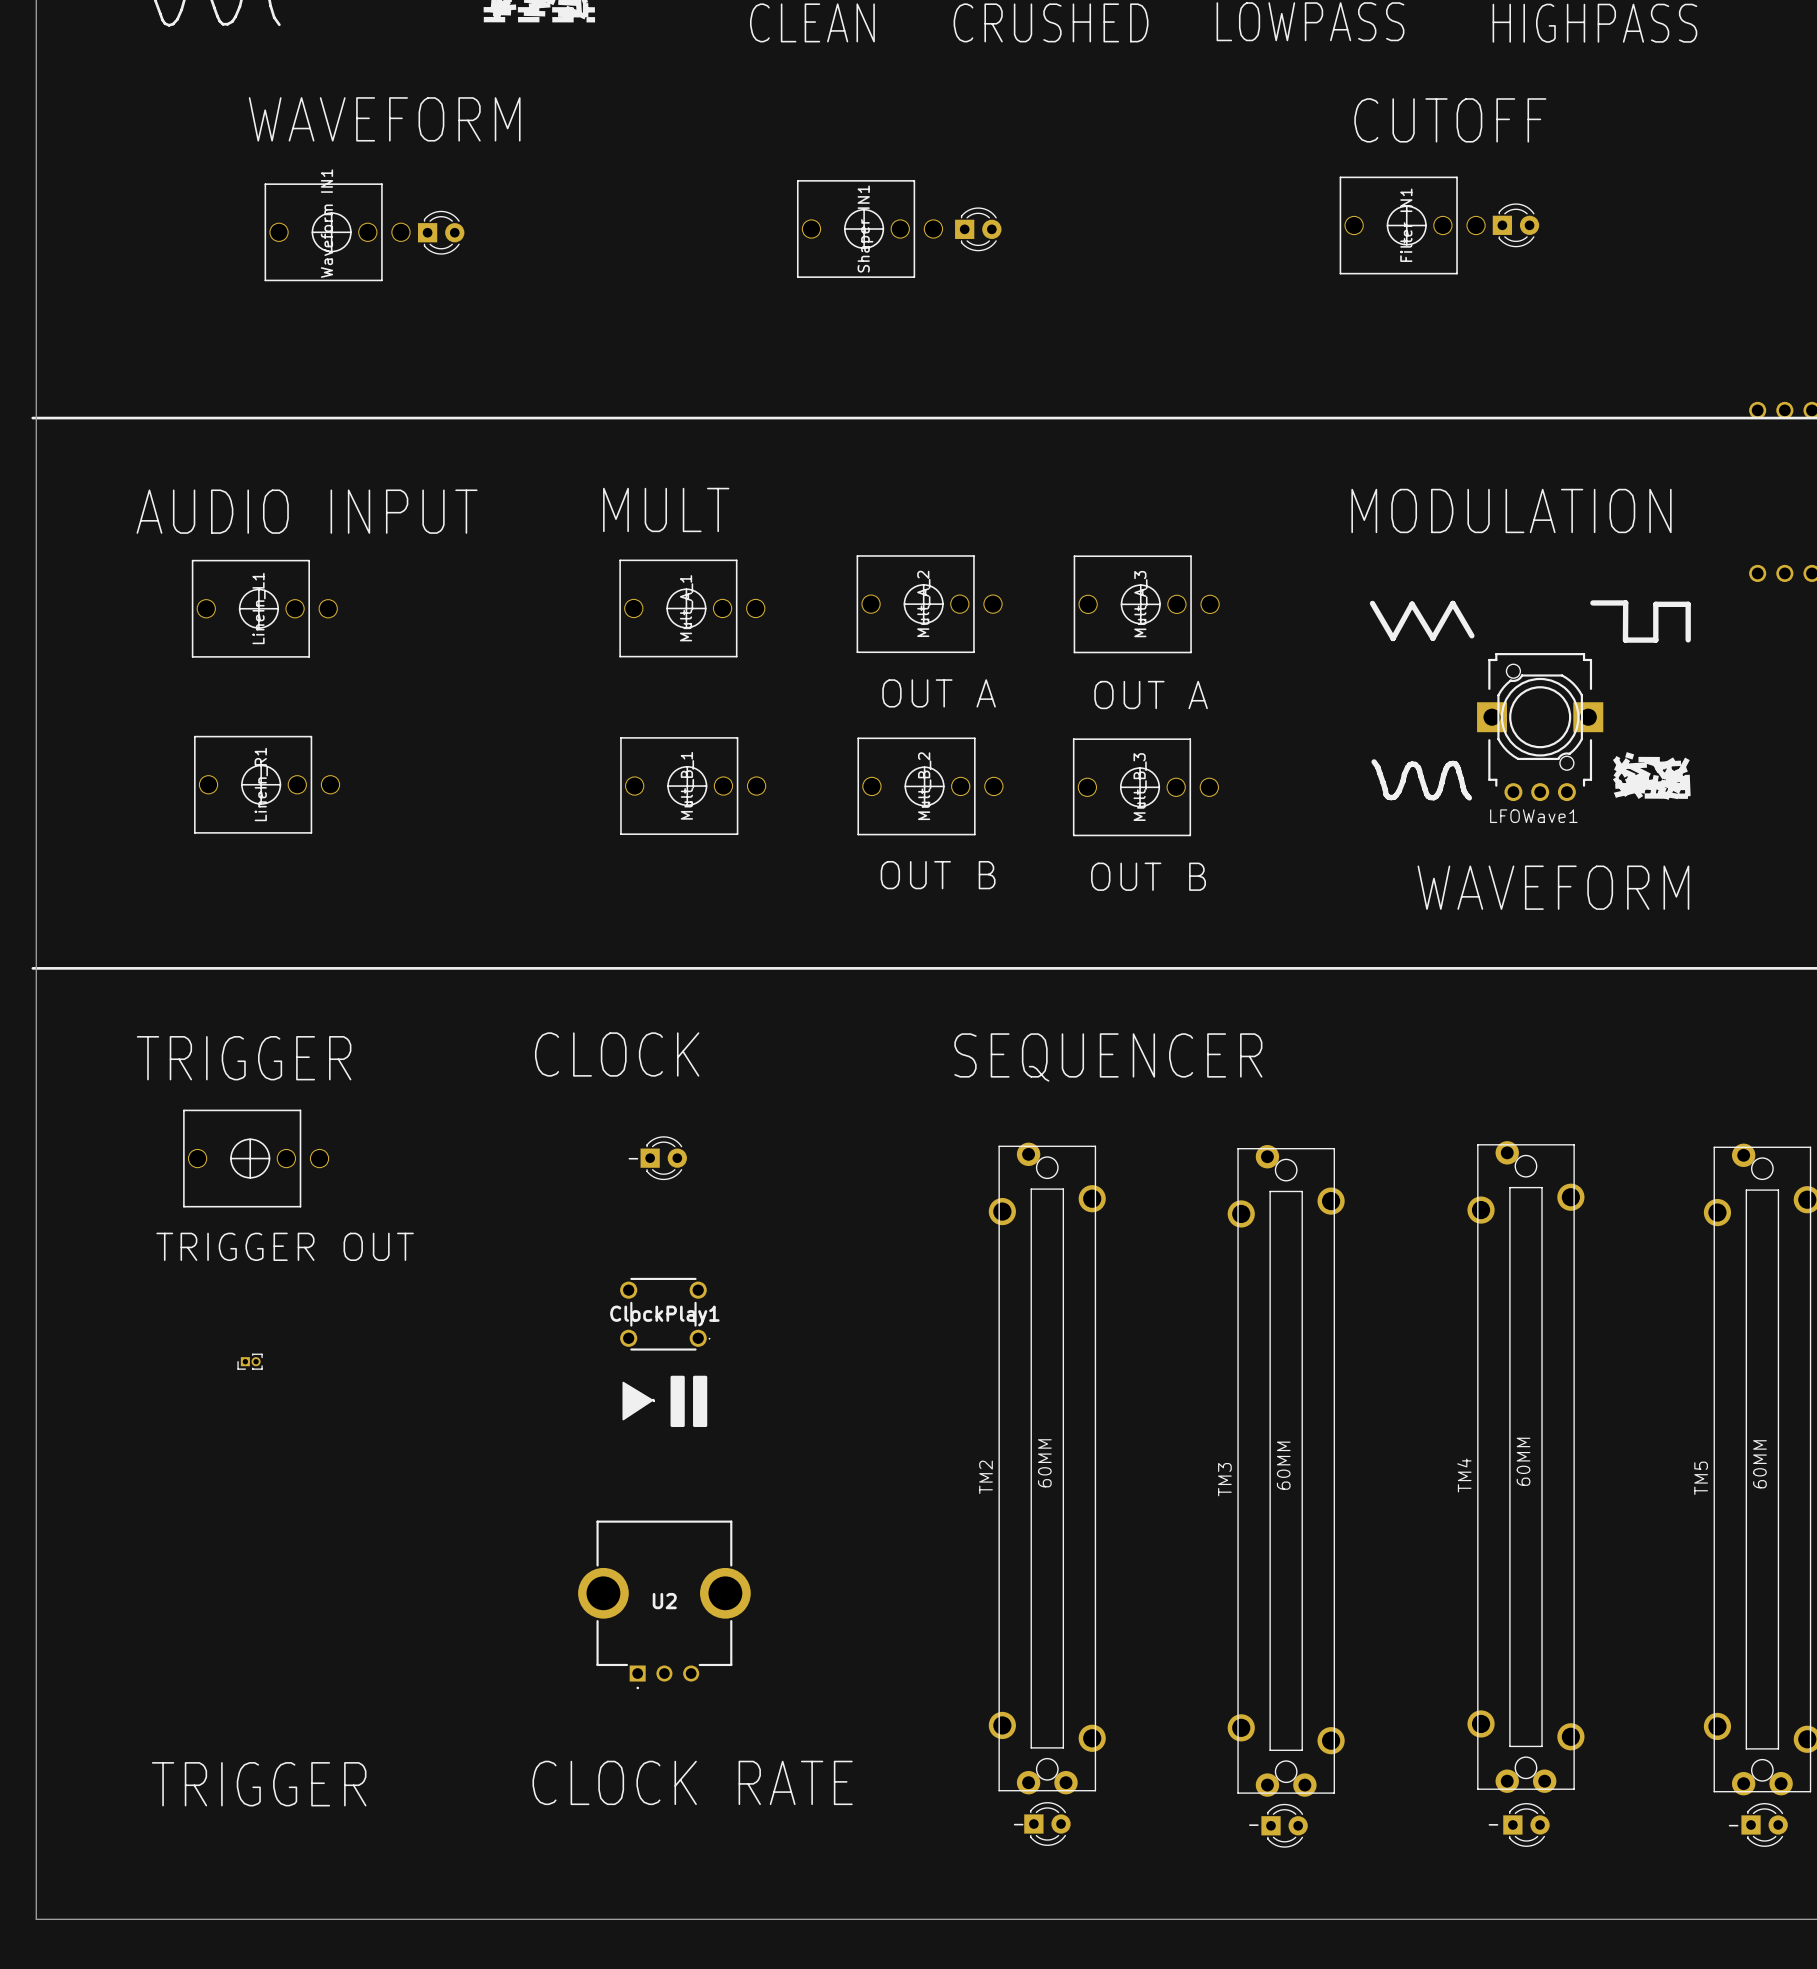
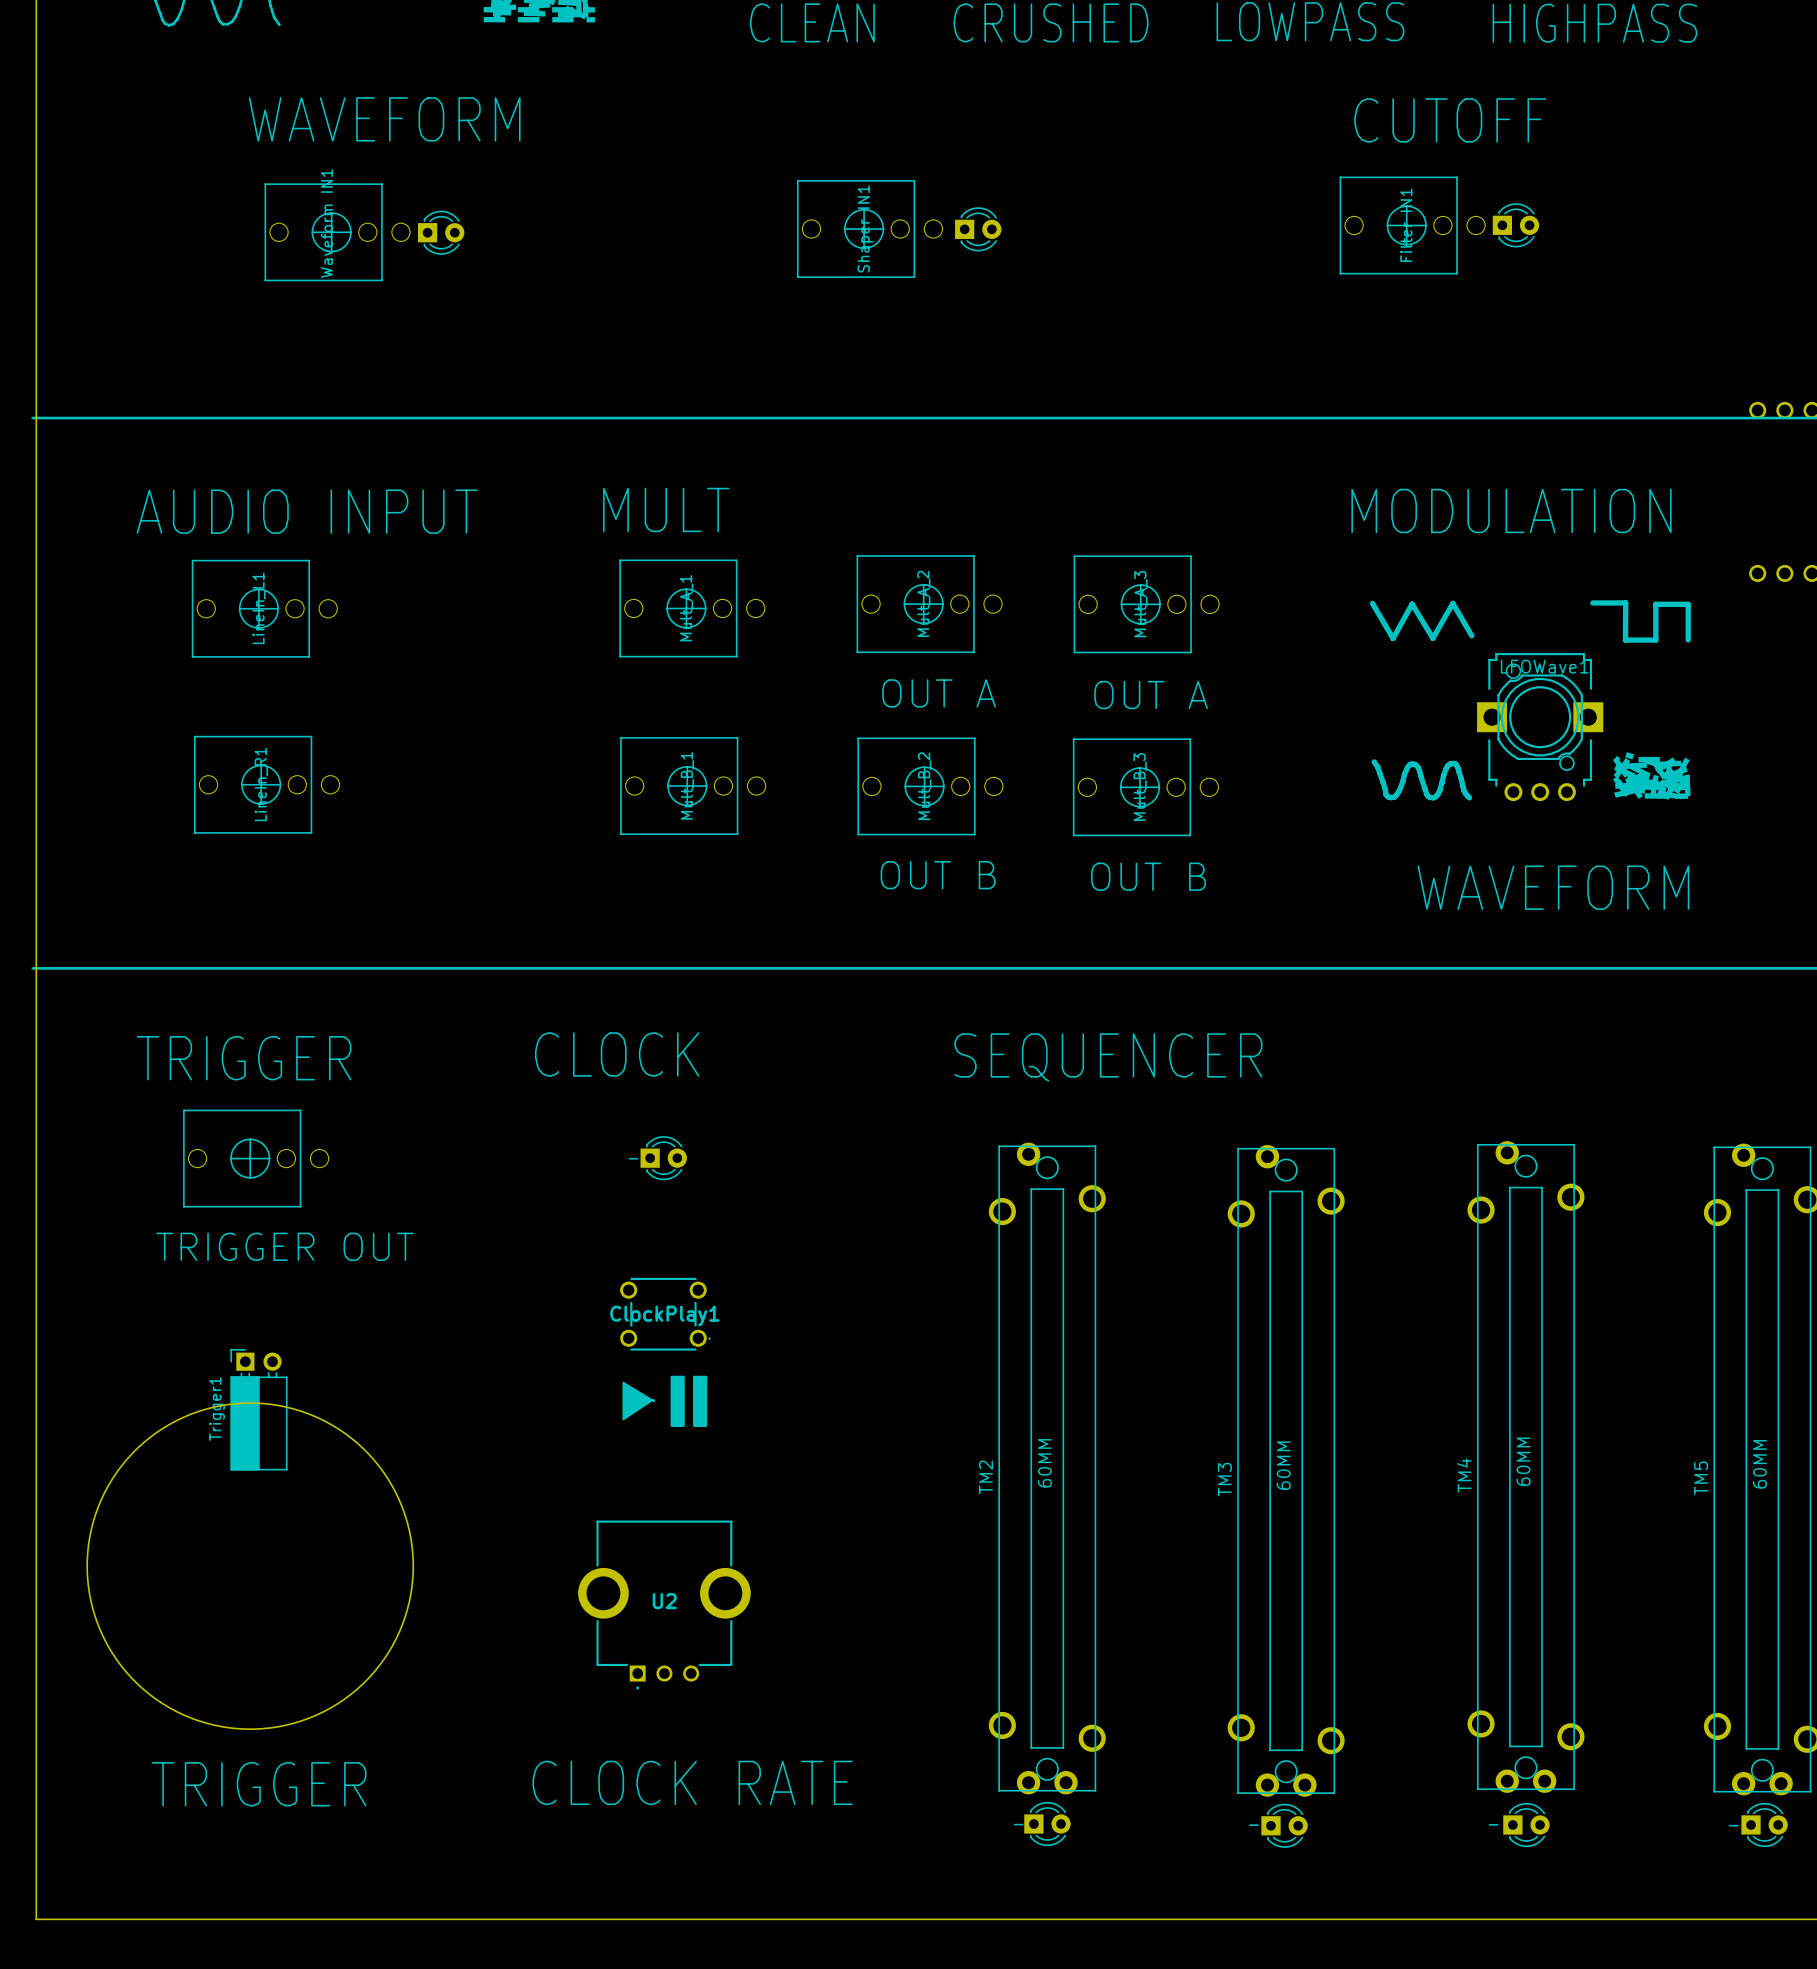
LFOWave1 name position: LFOWave1 (1533, 816) -> LFOWave1 (1544, 666)
part: (250, 1361) -> none
round board edge: none -> [86, 1402, 414, 1730]
Trigger1: none -> (258, 1409)

